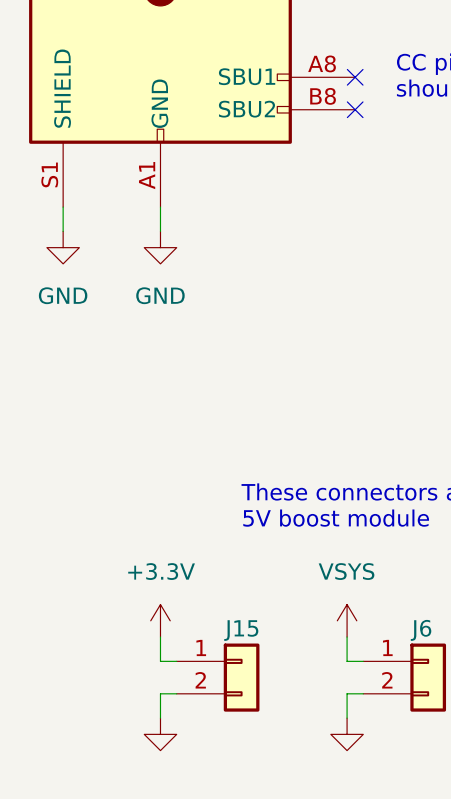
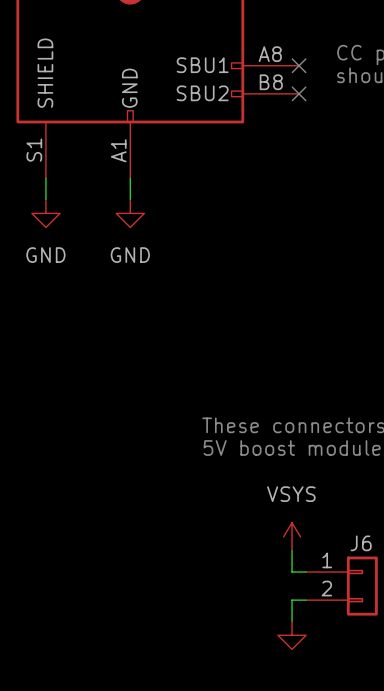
power symbol: +3.3V (160, 620) -> none
wire: (160, 637) (160, 661) (176, 661) -> none
J15: (218, 677) -> none
wire: (176, 693) (160, 693) (160, 718) -> none
power symbol: (160, 734) -> none

